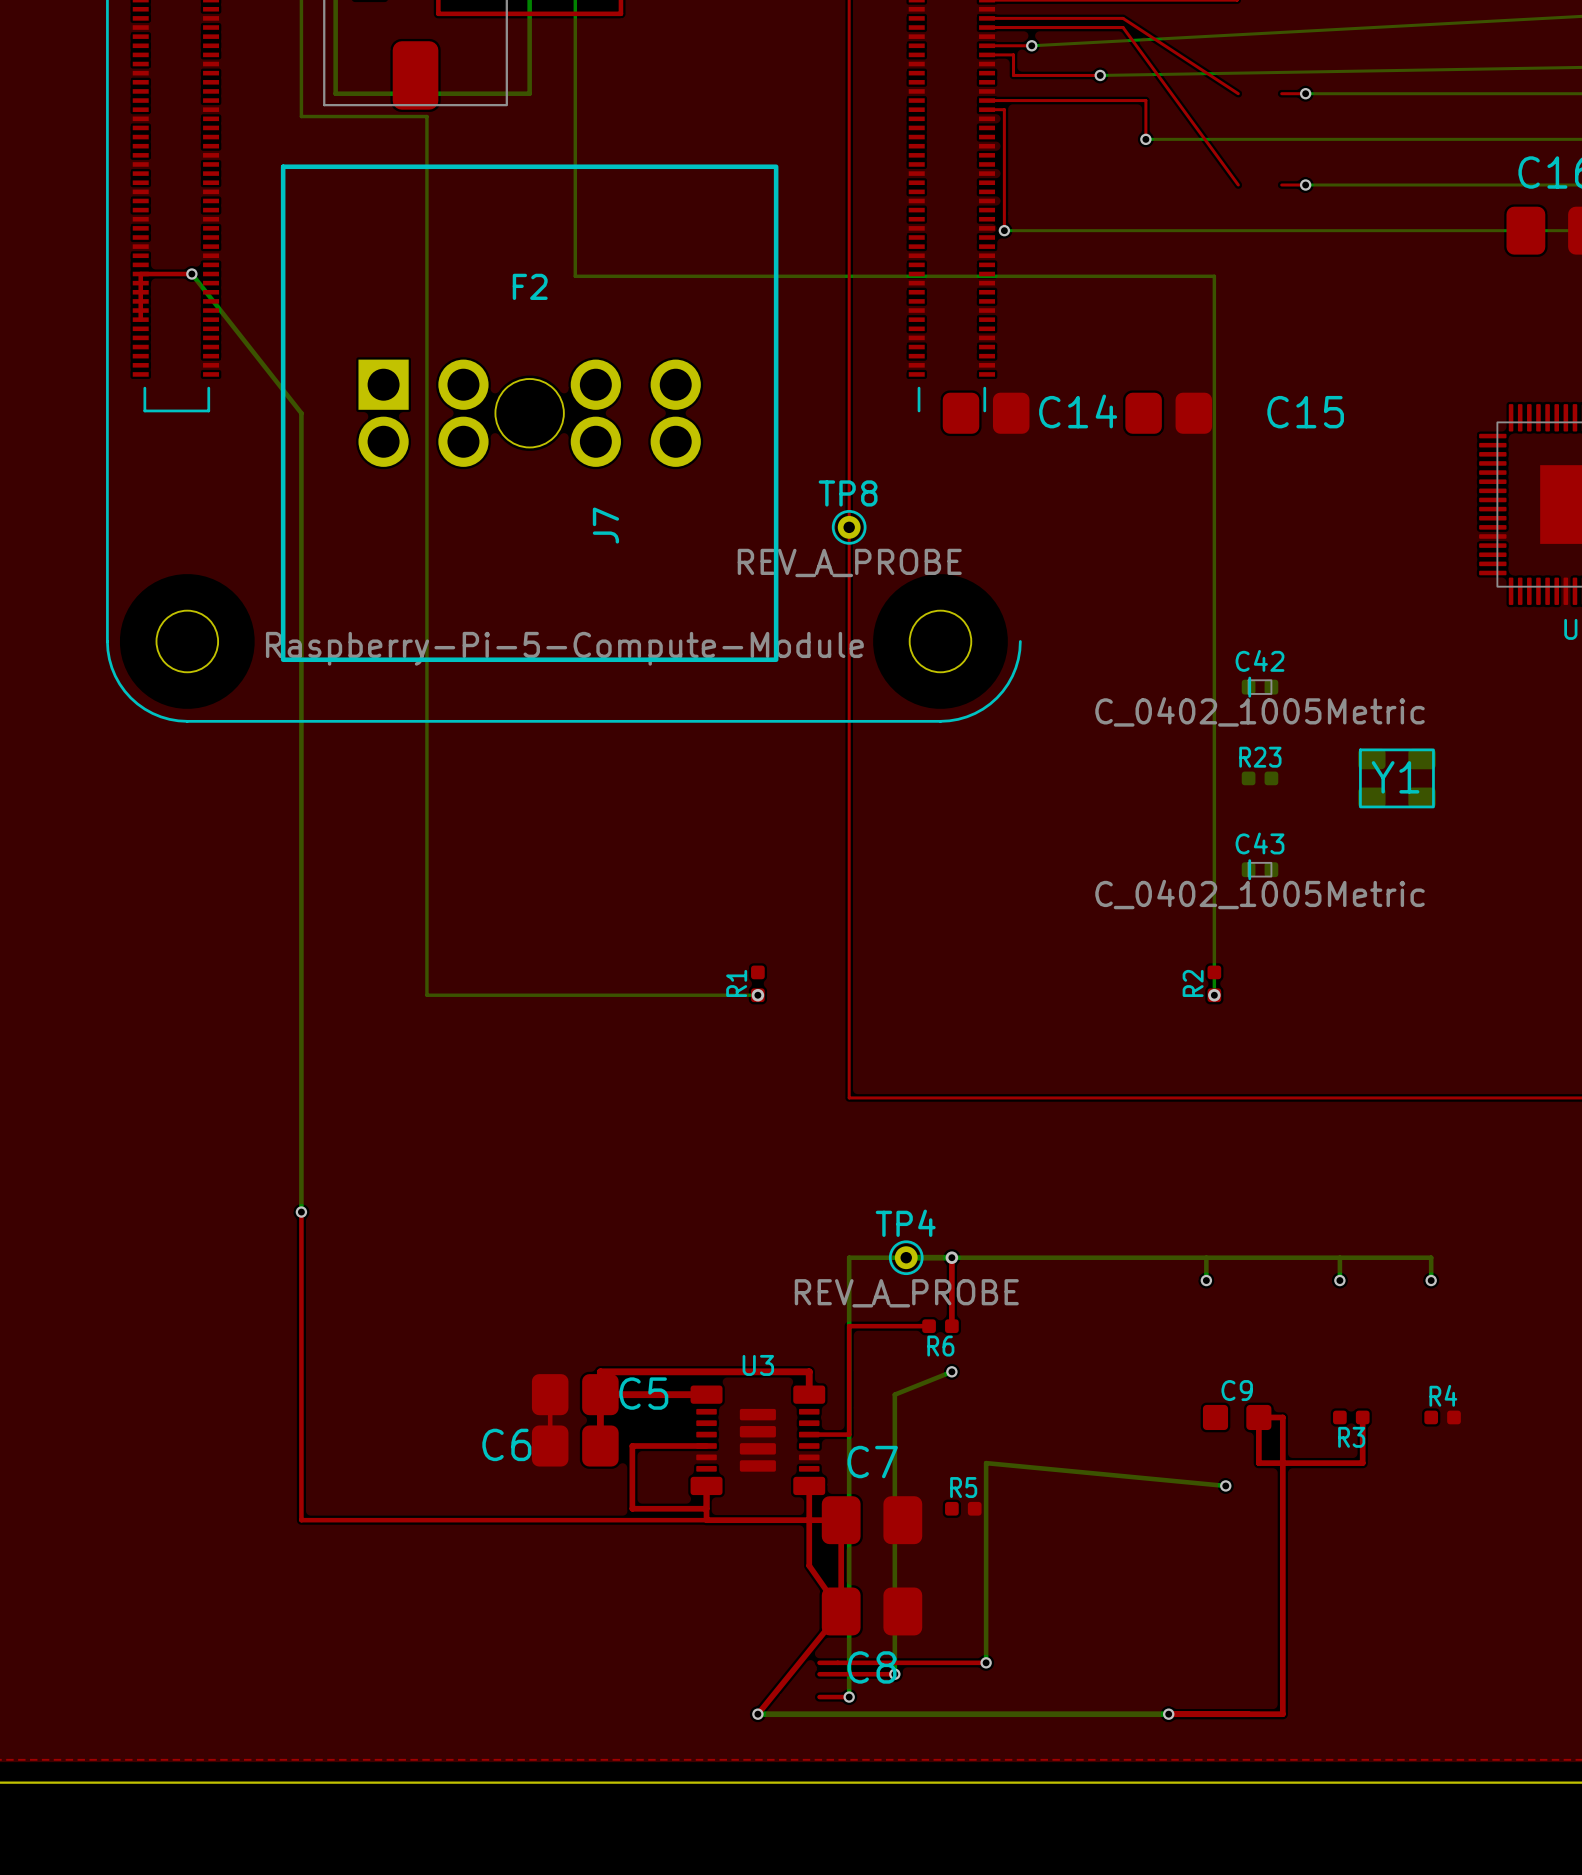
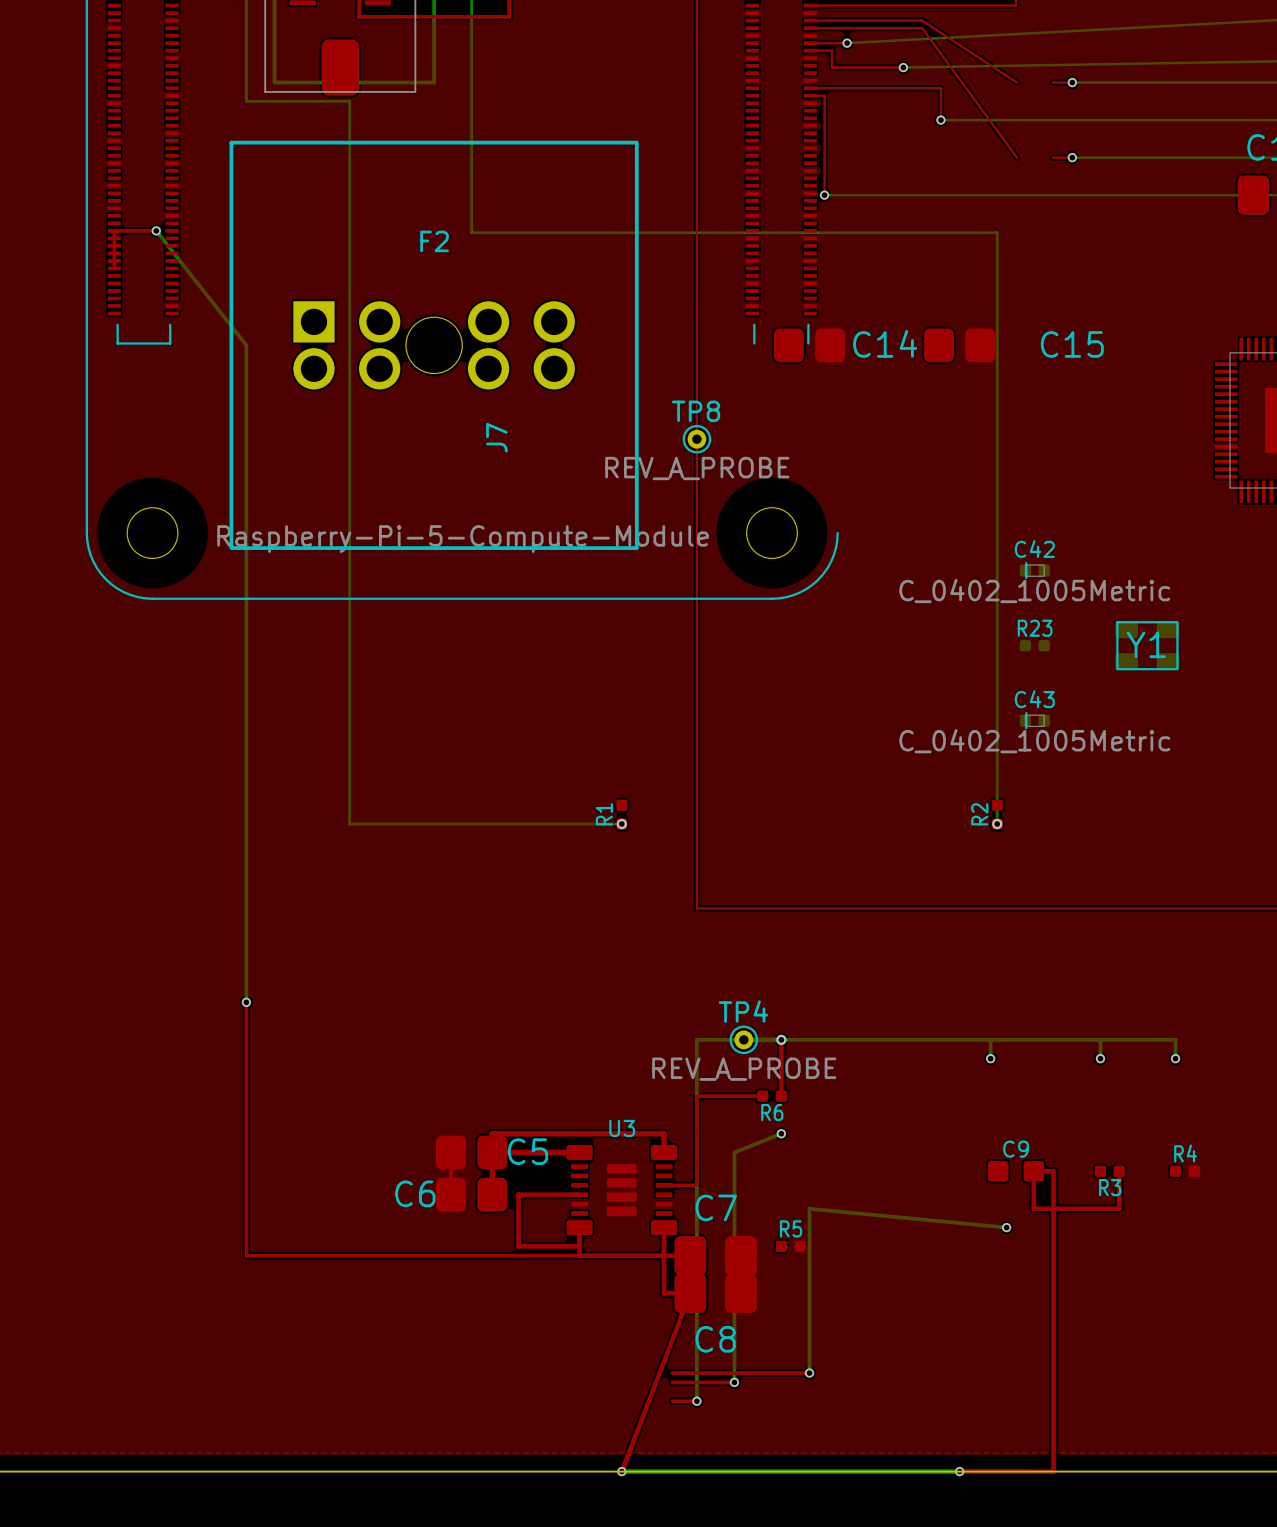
top track: (809, 1565) (841, 1611) -> (664, 1293) (690, 1293) (621, 1471)
top track: (841, 1565) (841, 1611) -> none
top track: (841, 1611) (757, 1714) -> none
C8 position: (872, 1611) -> (715, 1293)
bottom track: (757, 1714) (1168, 1714) -> (621, 1471) (959, 1471)
via position: (757, 1714) -> (621, 1471)
top track: (1168, 1714) (1282, 1714) -> (959, 1471) (1053, 1471) (1053, 1415)
via position: (1168, 1714) -> (959, 1471)

